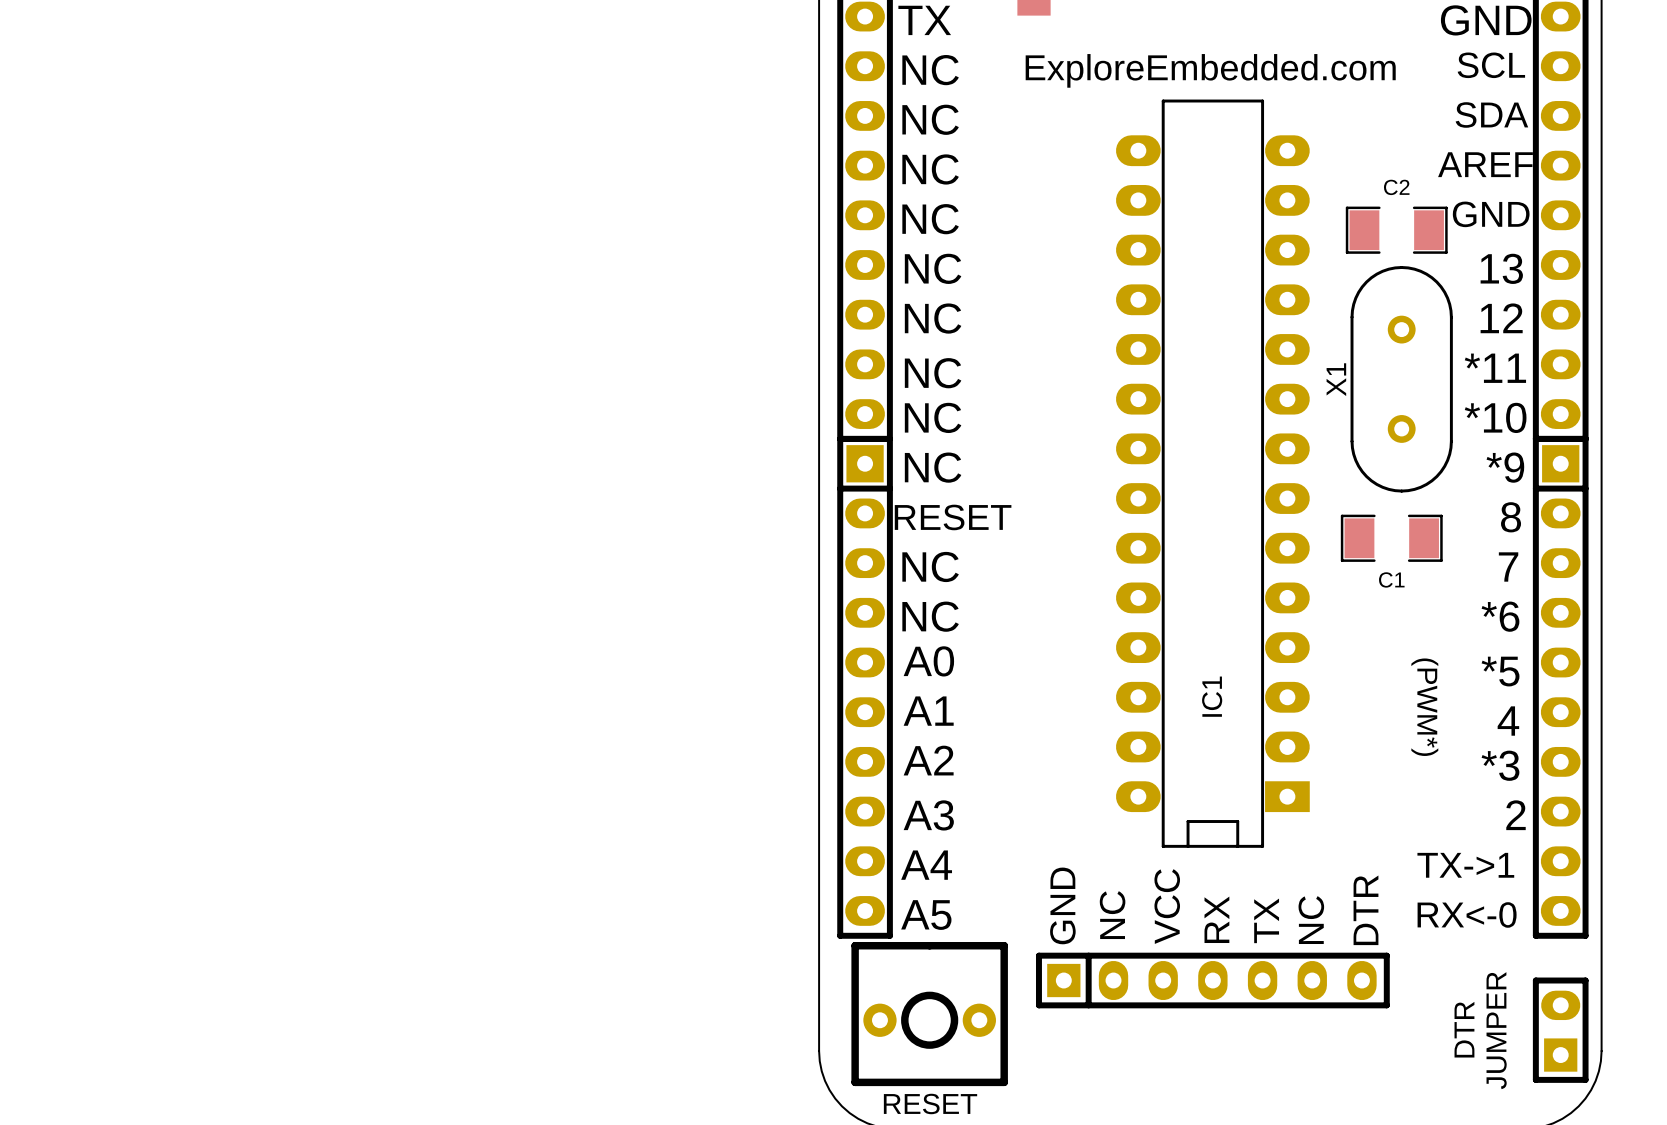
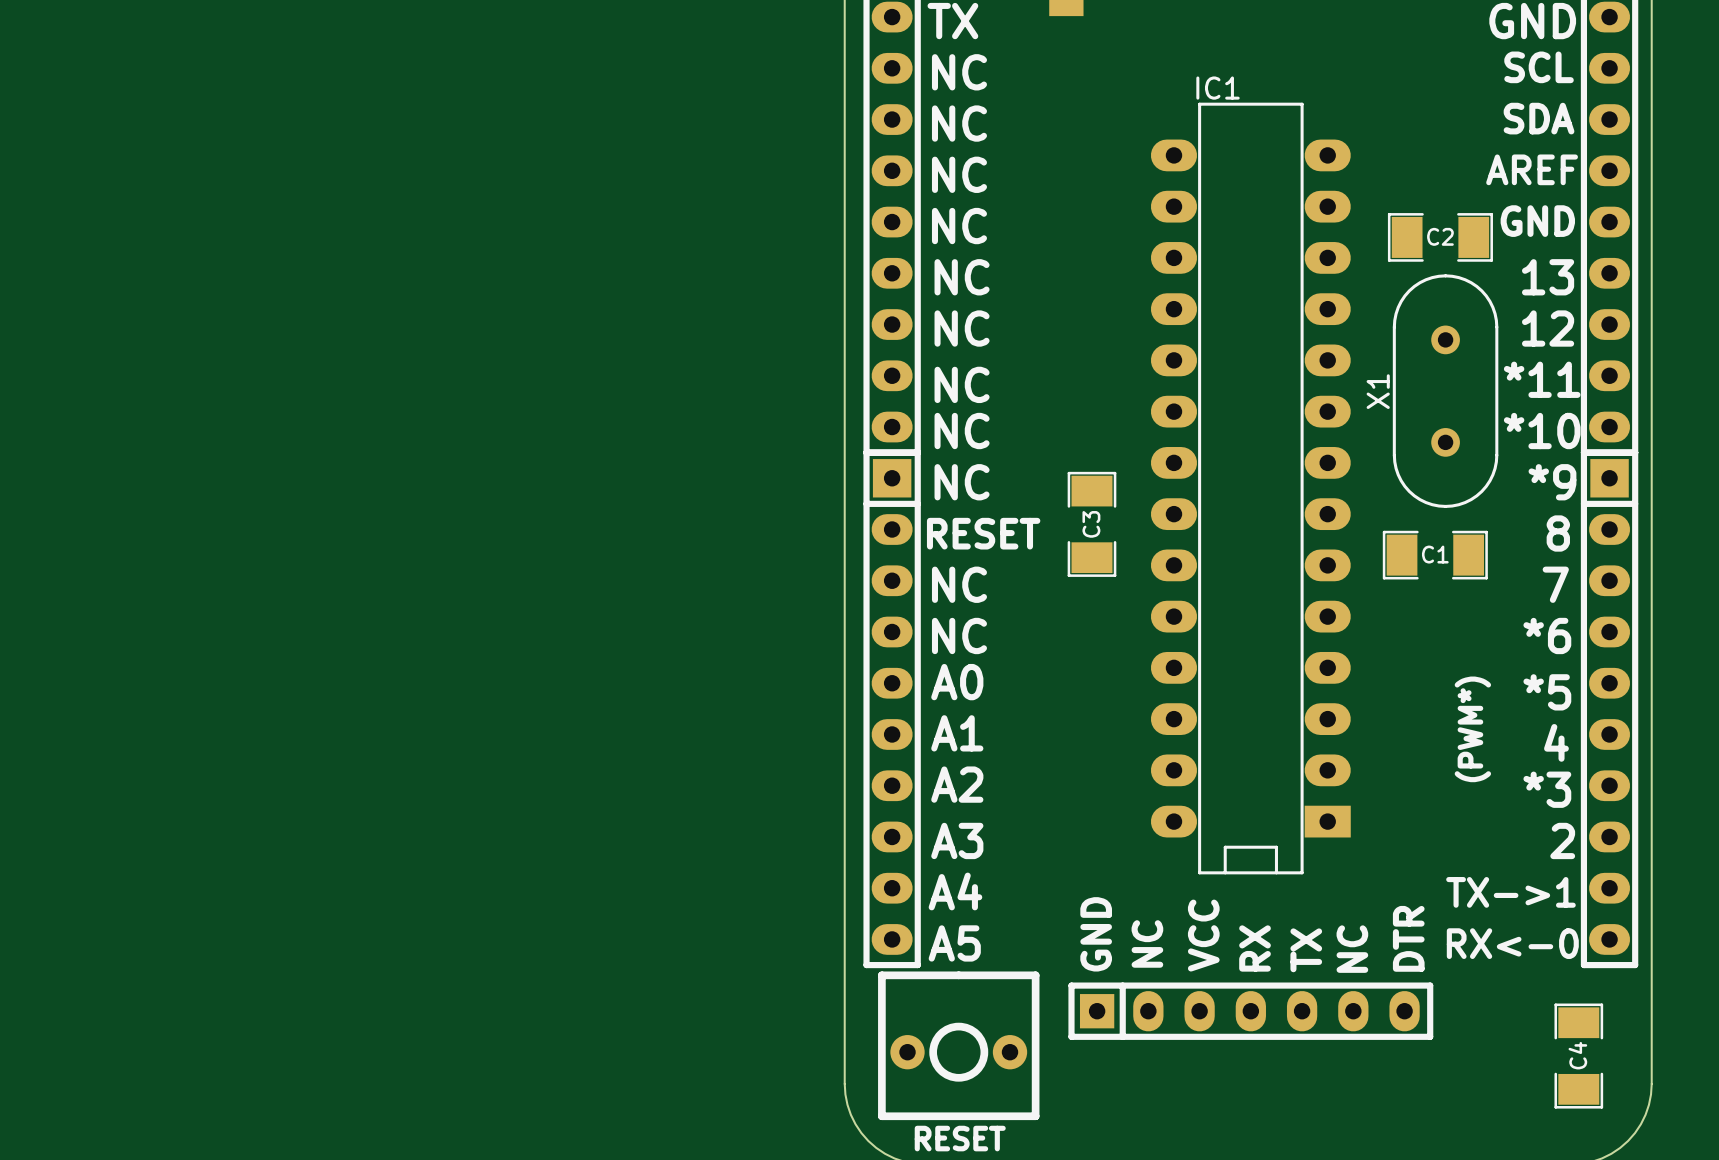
text: ExploreEmbedded.com (1210, 70) -> none
C2 name position: C2 (1396, 187) -> C2 (1440, 236)
C3: none -> (1091, 524)
C1 name position: C1 (1391, 579) -> C1 (1435, 554)
IC1 name rotation: 0° (1212, 696) -> 90° clockwise (1218, 88)
IC1 name position: IC1 (1212, 696) -> IC1 (1218, 88)
text rotation: 0° (1424, 707) -> 180° (1472, 729)
C4: none -> (1578, 1056)
text: DTR (1464, 1029) -> none
text: JUMPER (1496, 1030) -> none
part: (1560, 1030) -> none

